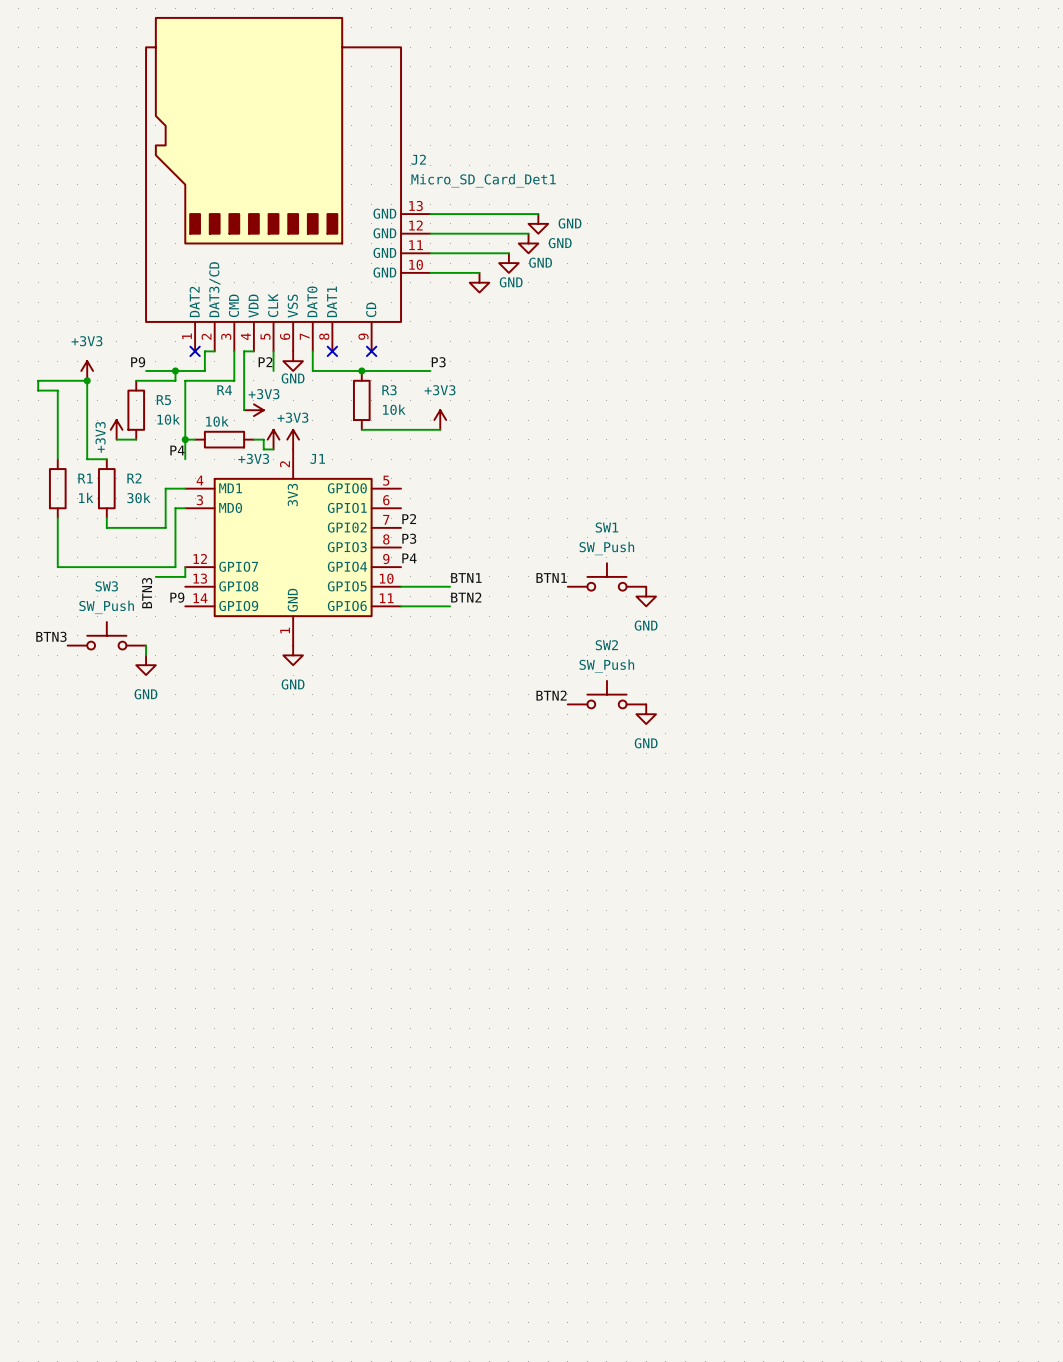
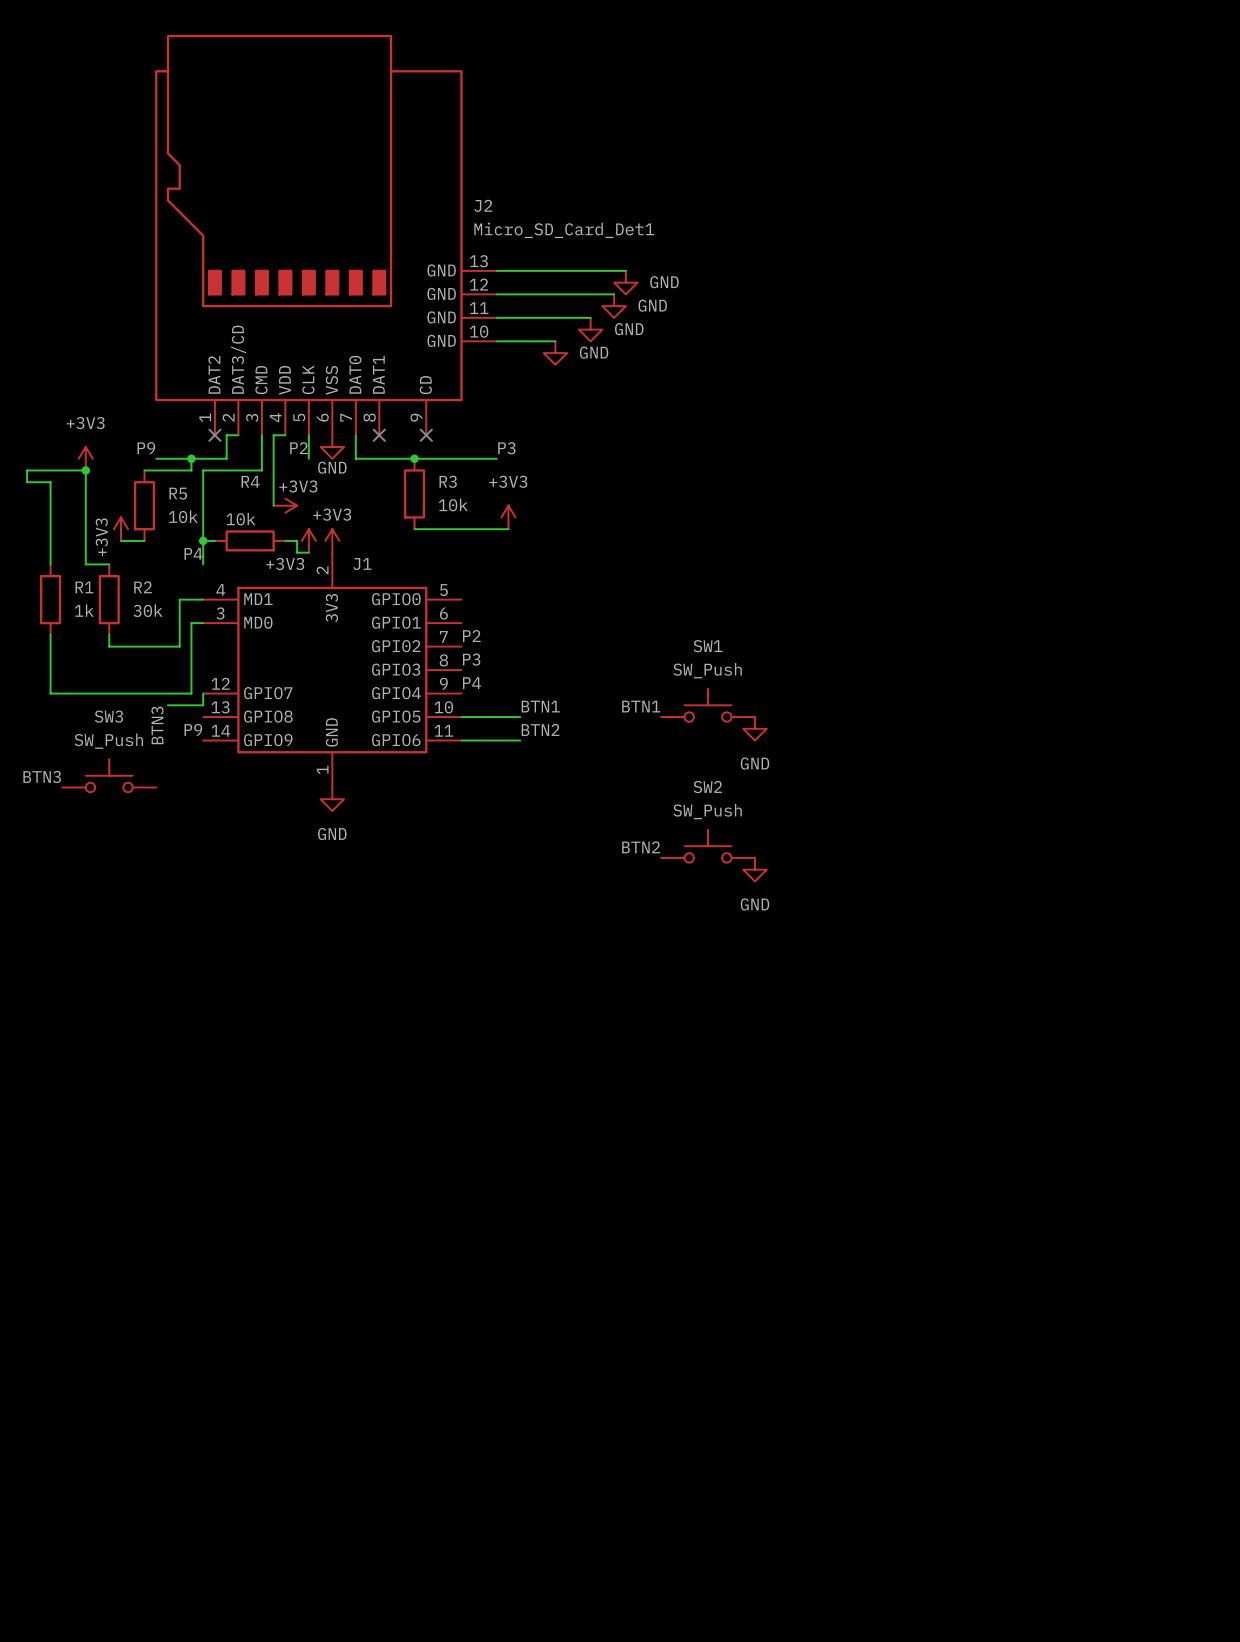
wire: (146, 645) (146, 655) -> none
power symbol: GND (146, 665) -> none

